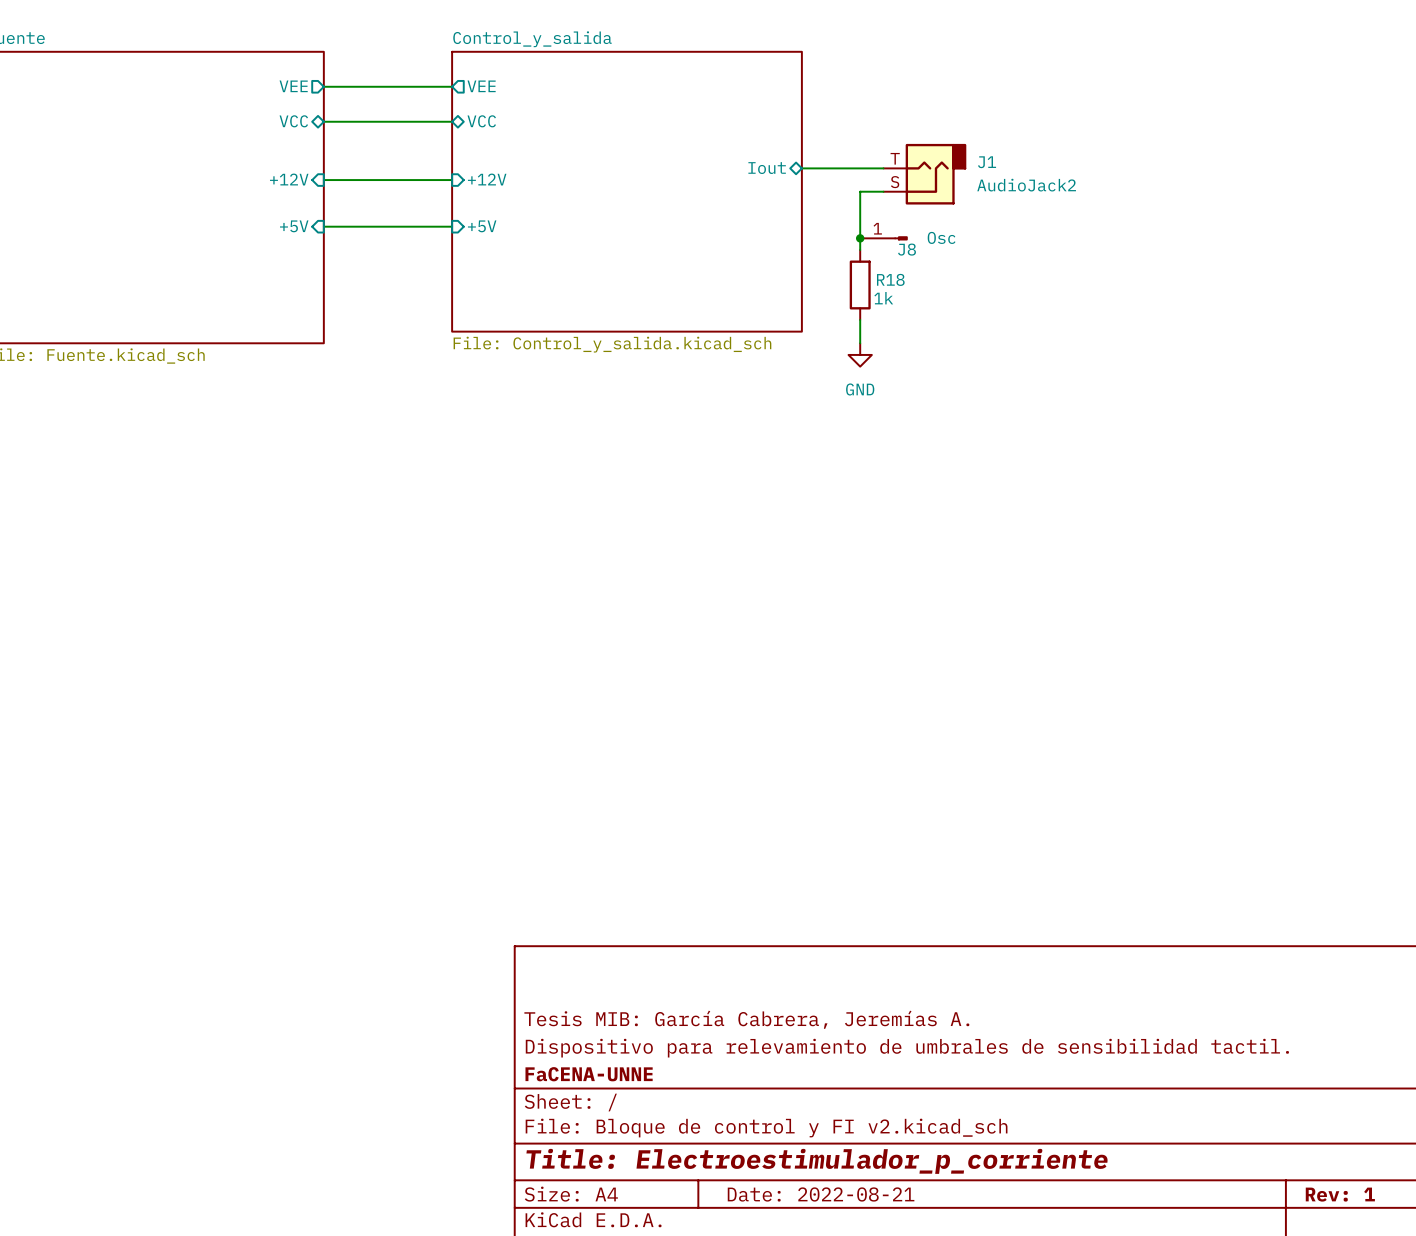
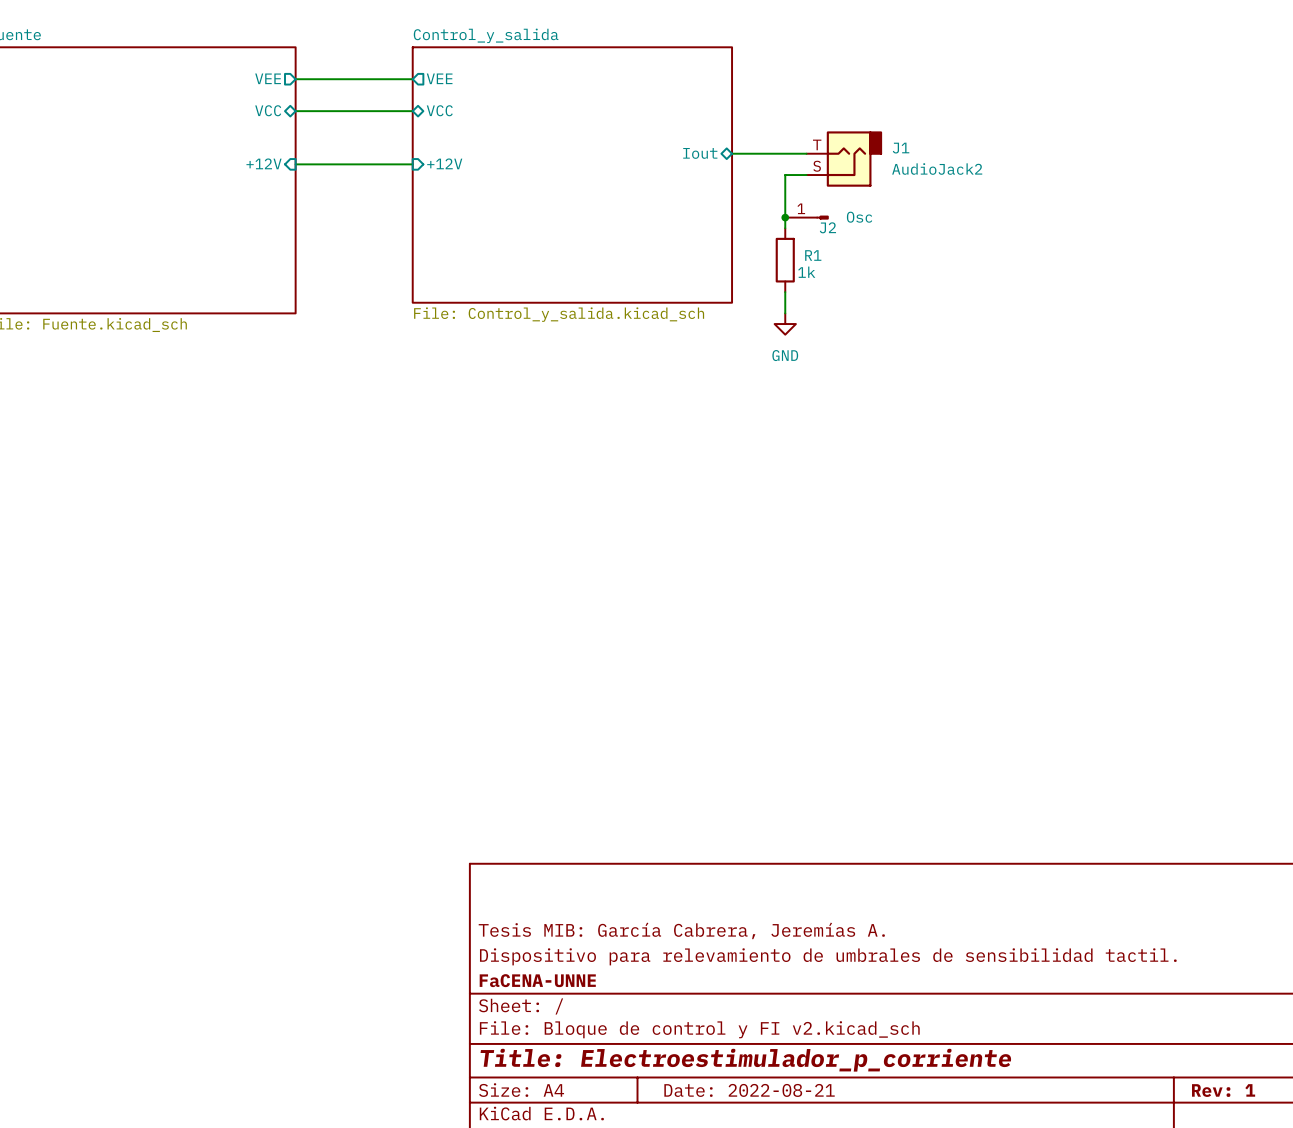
sheet pin: +5V (294, 226) -> none
wire: (323, 226) (452, 226) -> none
sheet pin: +5V (482, 226) -> none
J8 name: J8 (907, 249) -> J2 (827, 227)
R18 name: R18 (890, 279) -> R1 (813, 255)

